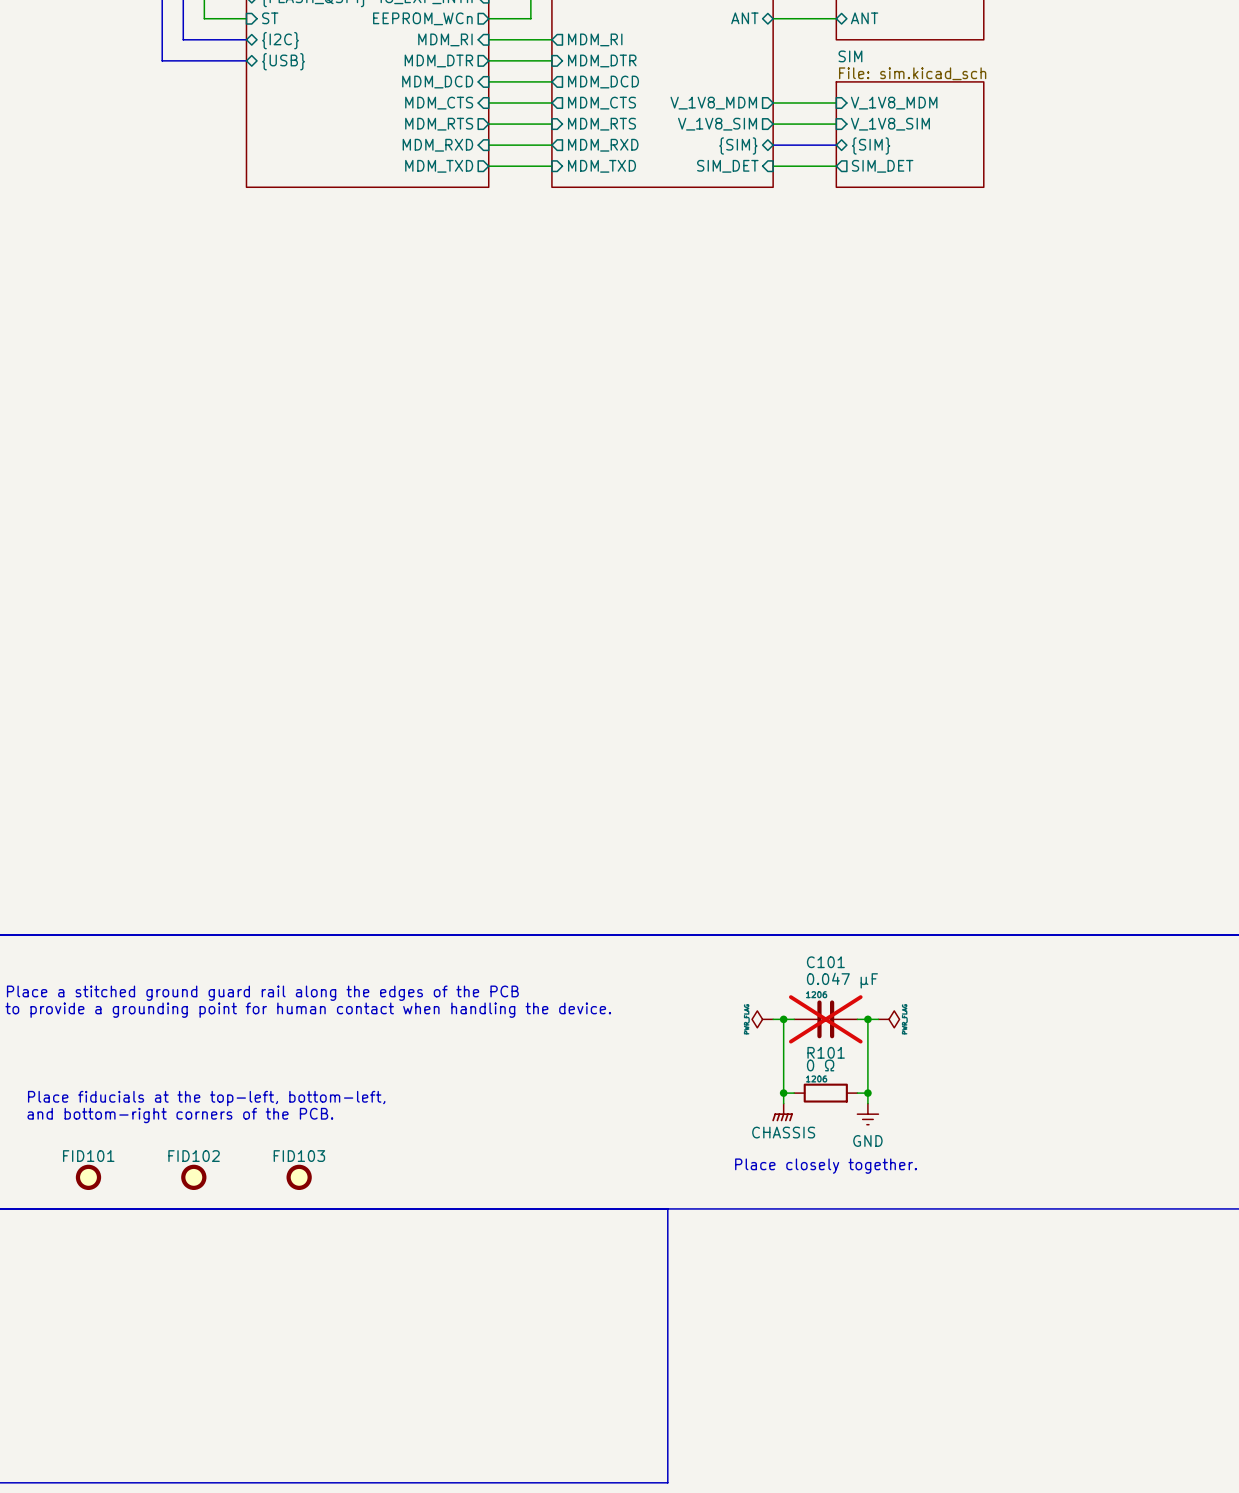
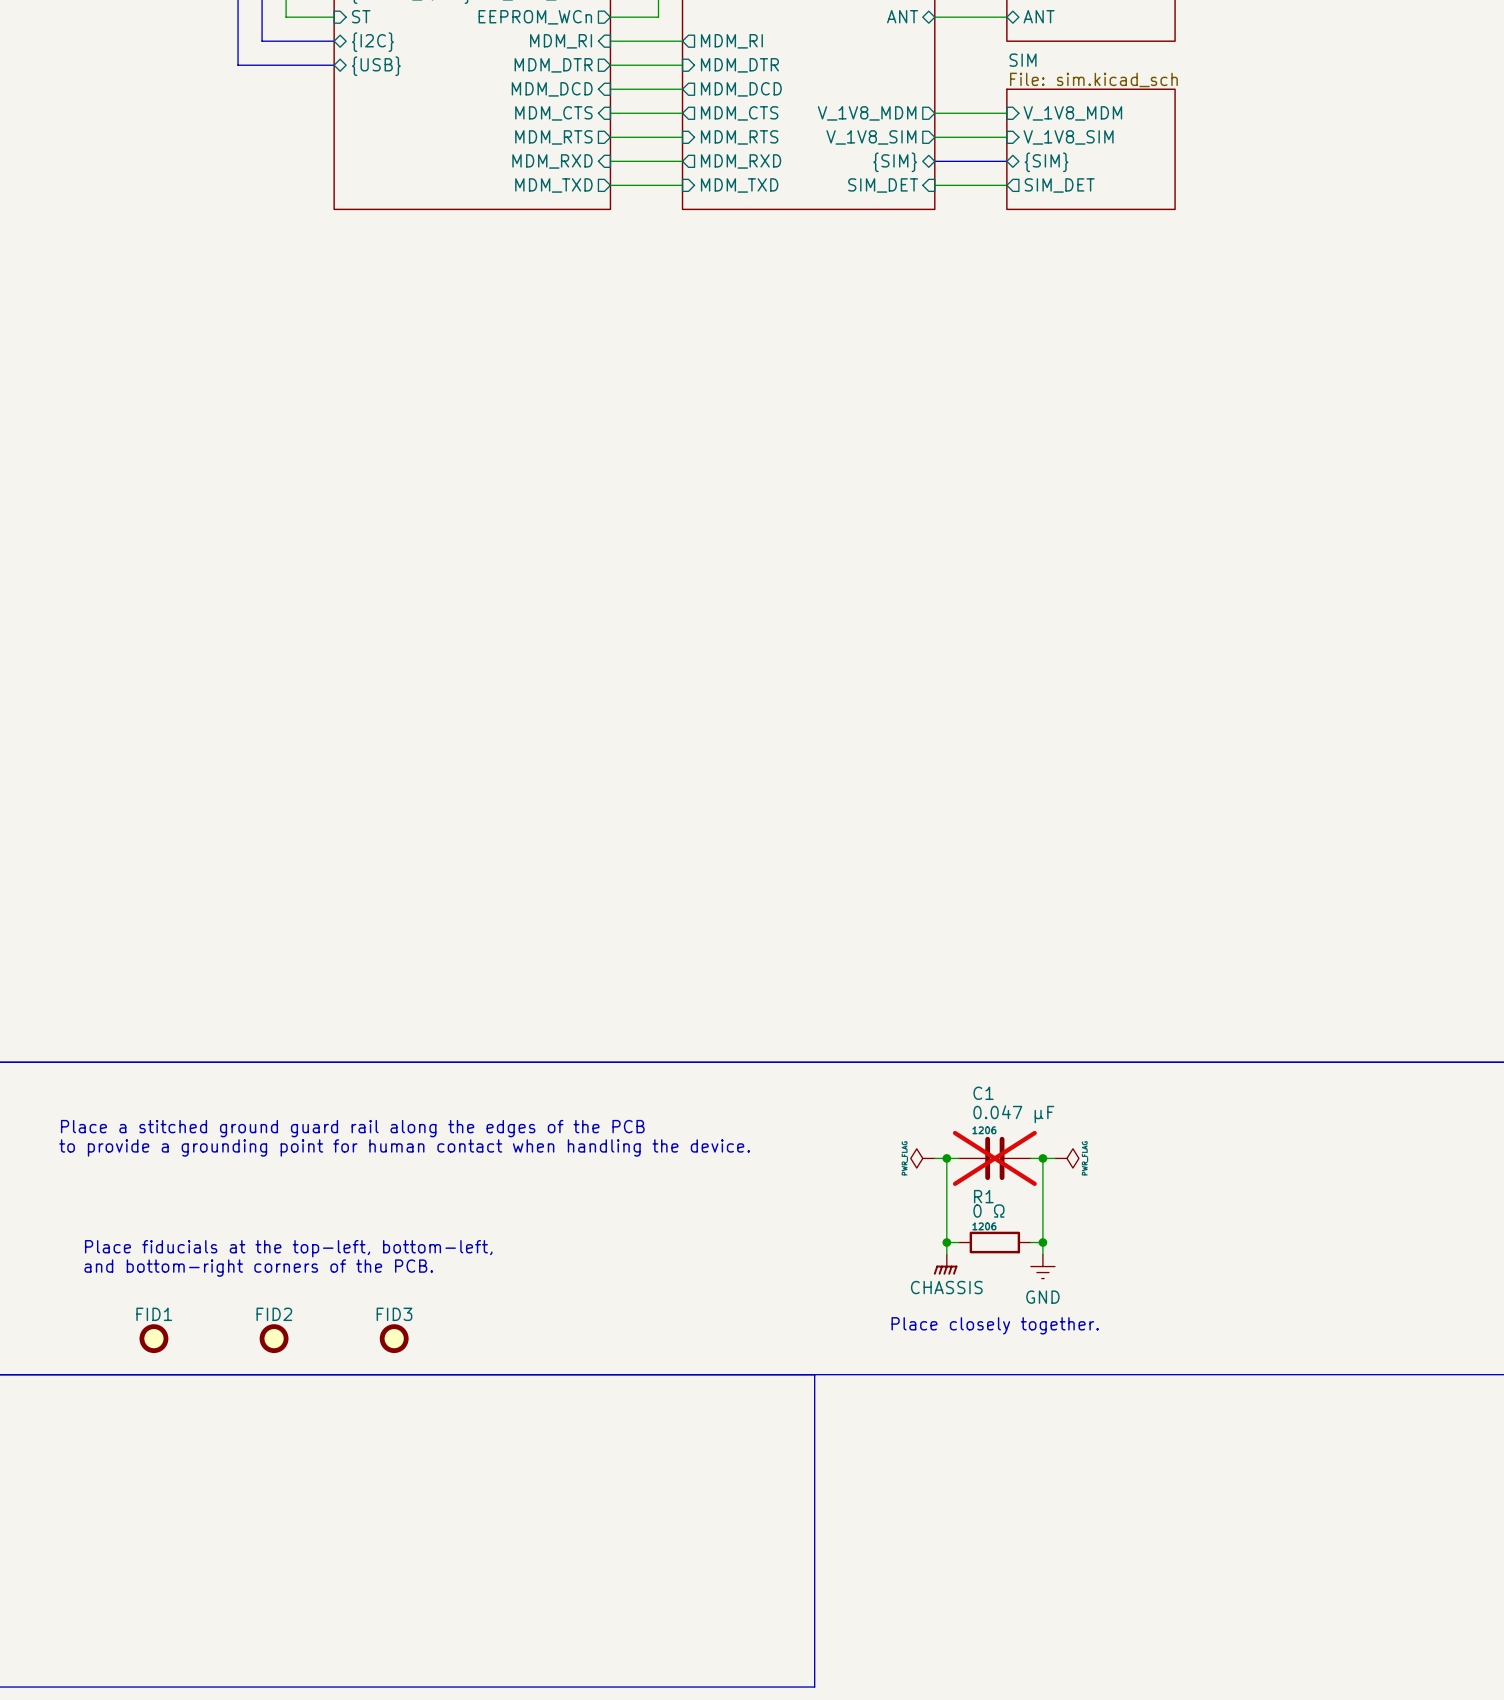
C101 name: C101 (825, 962) -> C1 (983, 1093)
R101 name: R101 (826, 1052) -> R1 (983, 1196)
FID101 name: FID101 (88, 1156) -> FID1 (154, 1314)
FID102 name: FID102 (194, 1156) -> FID2 (274, 1314)
FID103 name: FID103 (299, 1156) -> FID3 (394, 1314)

